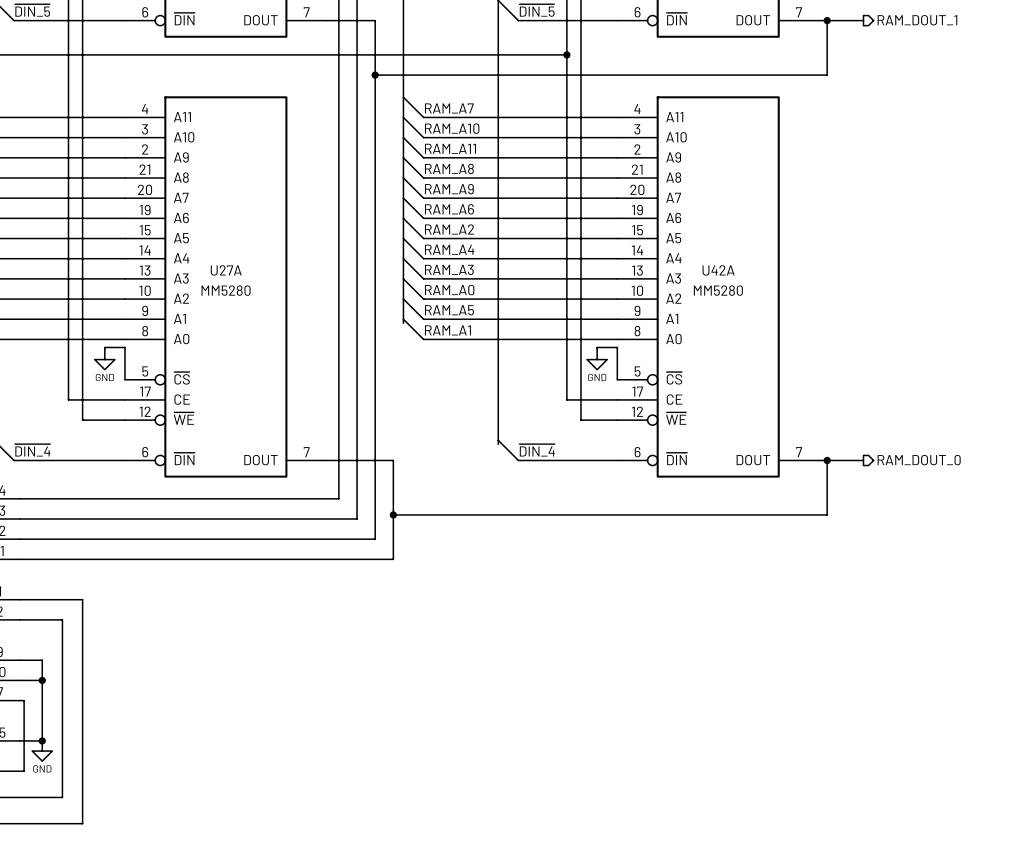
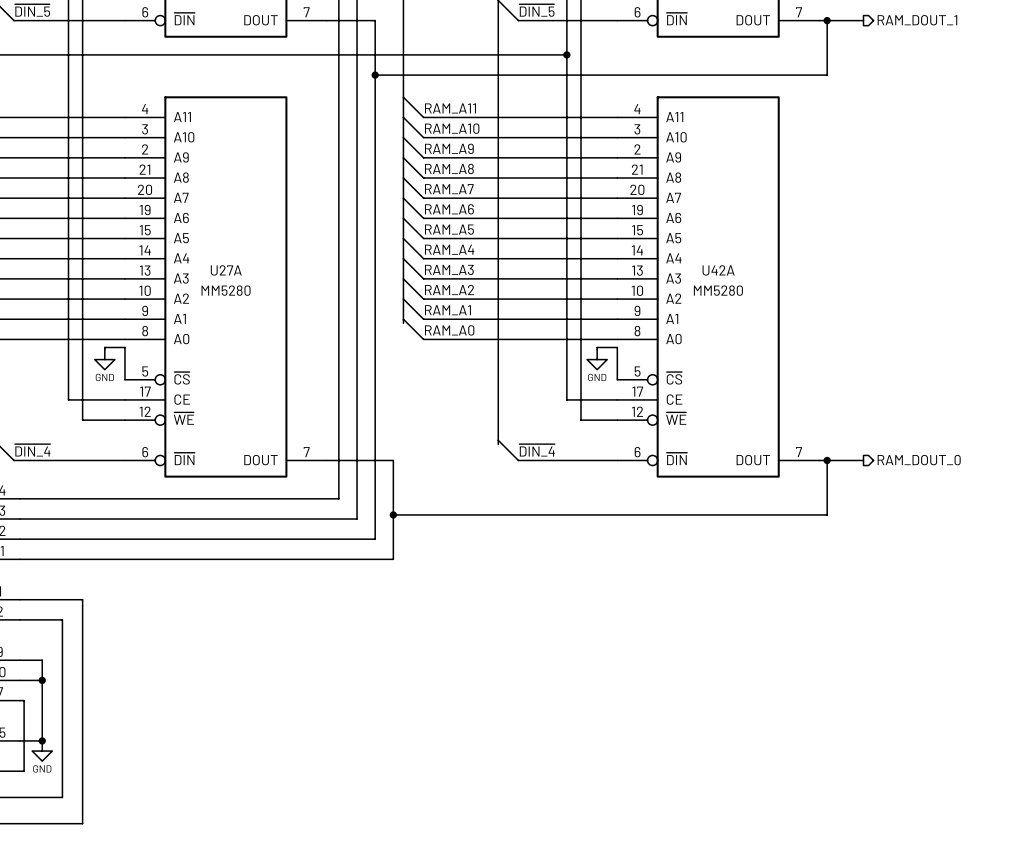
label: RAM_A7 (449, 108) -> RAM_A11 (450, 108)
label: RAM_A11 (450, 148) -> RAM_A9 (449, 148)
label: RAM_A9 (449, 189) -> RAM_A7 (449, 189)
label: RAM_A2 (449, 229) -> RAM_A5 (449, 229)
label: RAM_A0 (449, 290) -> RAM_A2 (449, 290)
label: RAM_A5 (449, 310) -> RAM_A1 (447, 310)
label: RAM_A1 (447, 330) -> RAM_A0 (449, 330)

